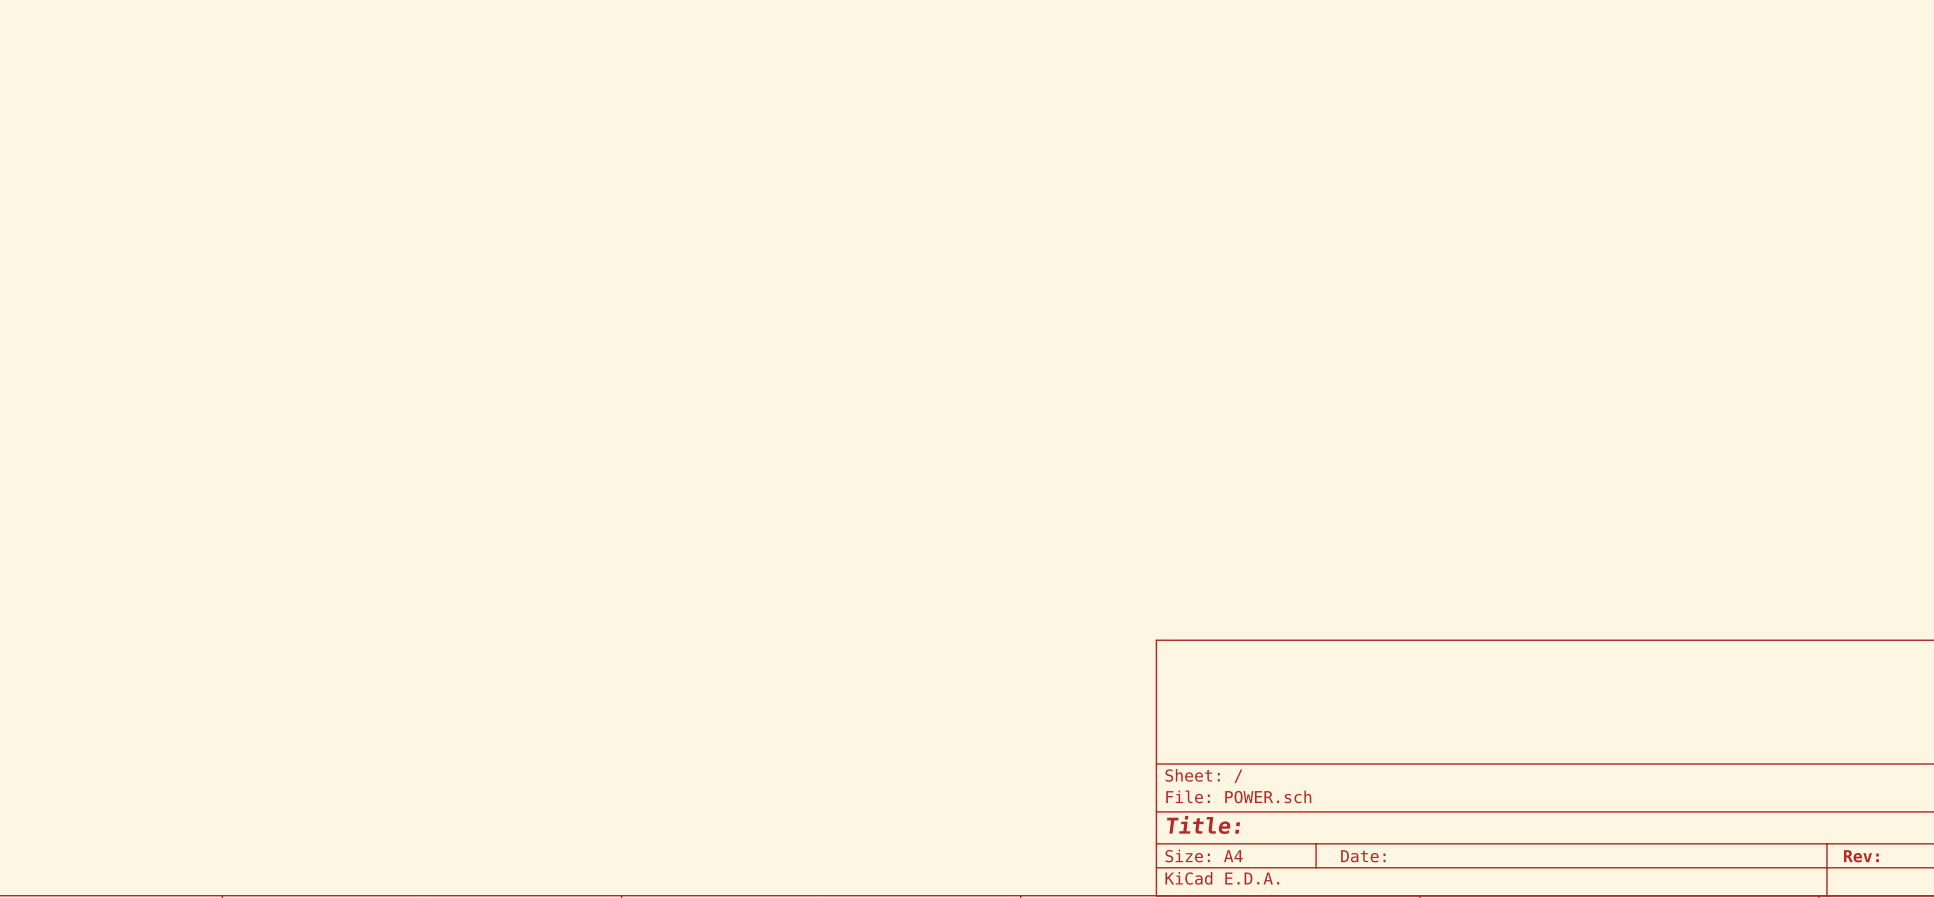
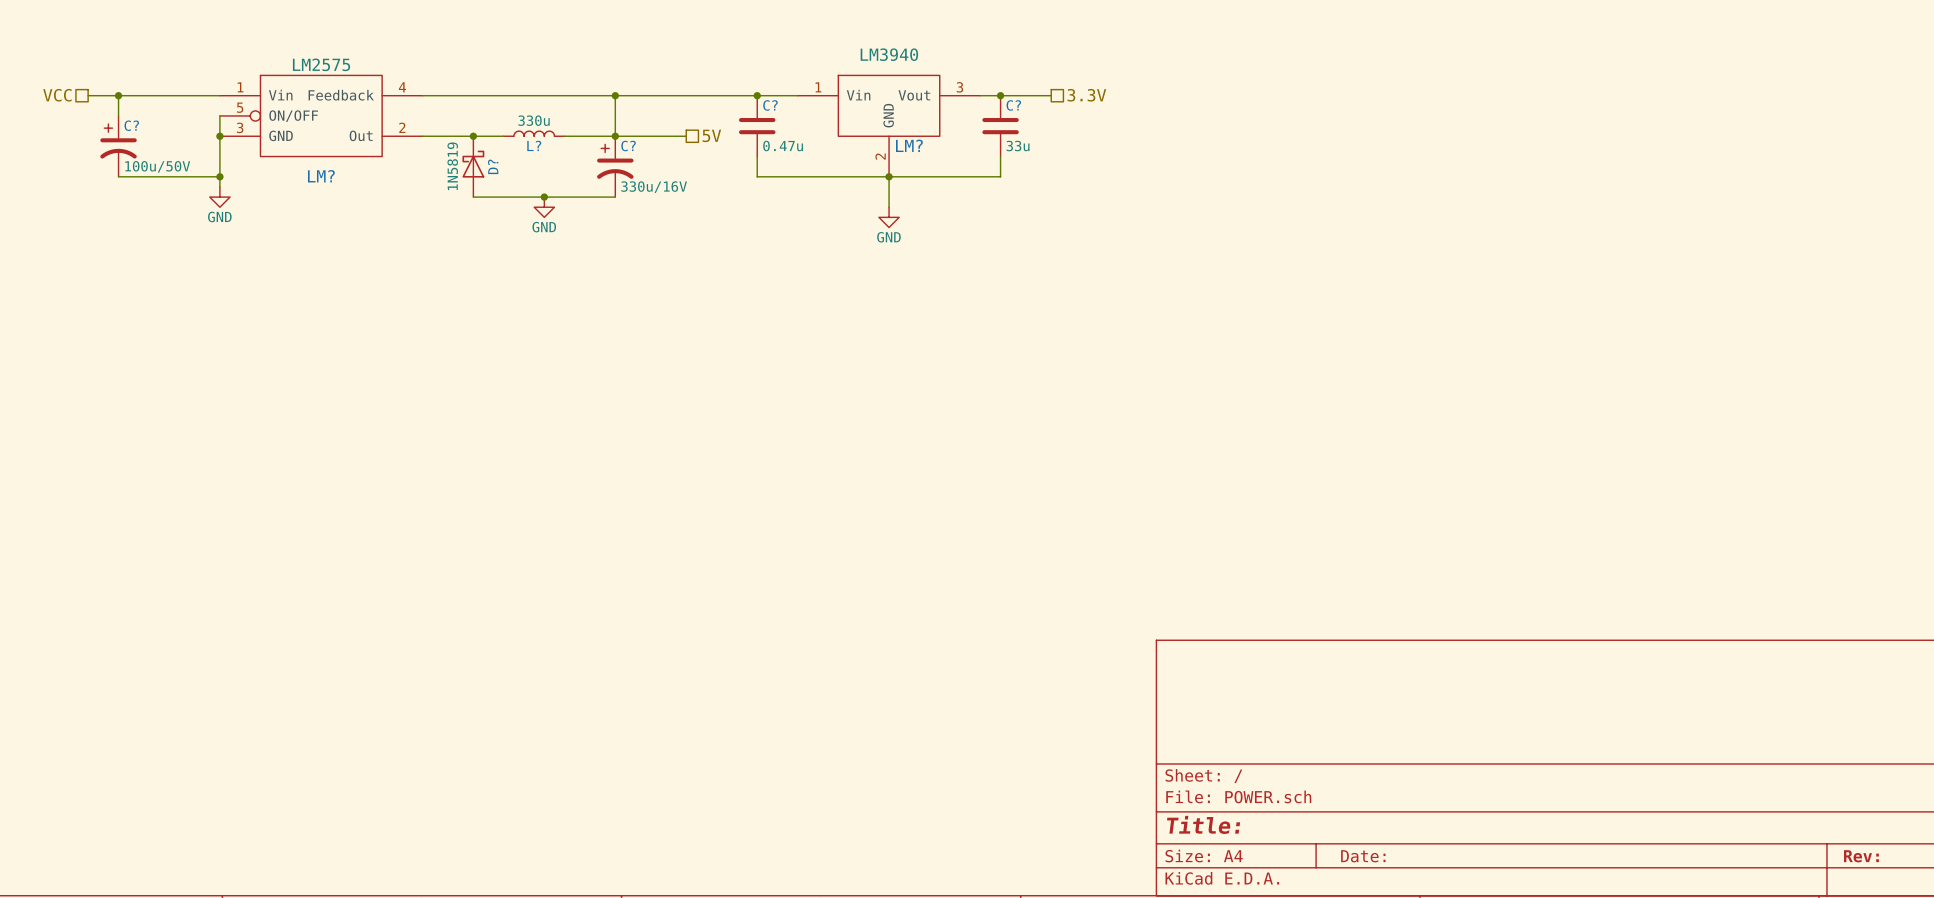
hierarchical label: none -> VCC (57, 95)
wire: none -> (88, 95) (219, 95)
wire: none -> (118, 95) (118, 115)
junction: none -> (118, 95)
wire: none -> (422, 95) (797, 95)
wire: none -> (615, 95) (615, 136)
junction: none -> (615, 95)
junction: none -> (757, 95)
wire: none -> (980, 95) (1051, 95)
junction: none -> (1000, 95)
hierarchical label: none -> 3.3V (1086, 95)
wire: none -> (219, 115) (219, 186)
LM?: none -> LM2575 (321, 115)
C?: none -> 0.47u (757, 126)
LM?: none -> LM3940 (889, 126)
C?: none -> 33u (1000, 126)
L?: none -> 330u (534, 133)
hierarchical label: none -> 5V (711, 135)
junction: none -> (219, 136)
wire: none -> (422, 136) (503, 136)
junction: none -> (473, 136)
wire: none -> (564, 136) (686, 136)
junction: none -> (615, 136)
C?: none -> 100u/50V (118, 146)
wire: none -> (757, 156) (757, 176) (1000, 176) (1000, 156)
D?: none -> 1N5819 (473, 166)
C?: none -> 330u/16V (615, 166)
wire: none -> (118, 176) (219, 176)
junction: none -> (219, 176)
wire: none -> (889, 176) (889, 207)
junction: none -> (889, 176)
power symbol: none -> GND (219, 197)
wire: none -> (473, 197) (615, 197)
junction: none -> (544, 197)
power symbol: none -> GND (544, 207)
power symbol: none -> GND (889, 217)

